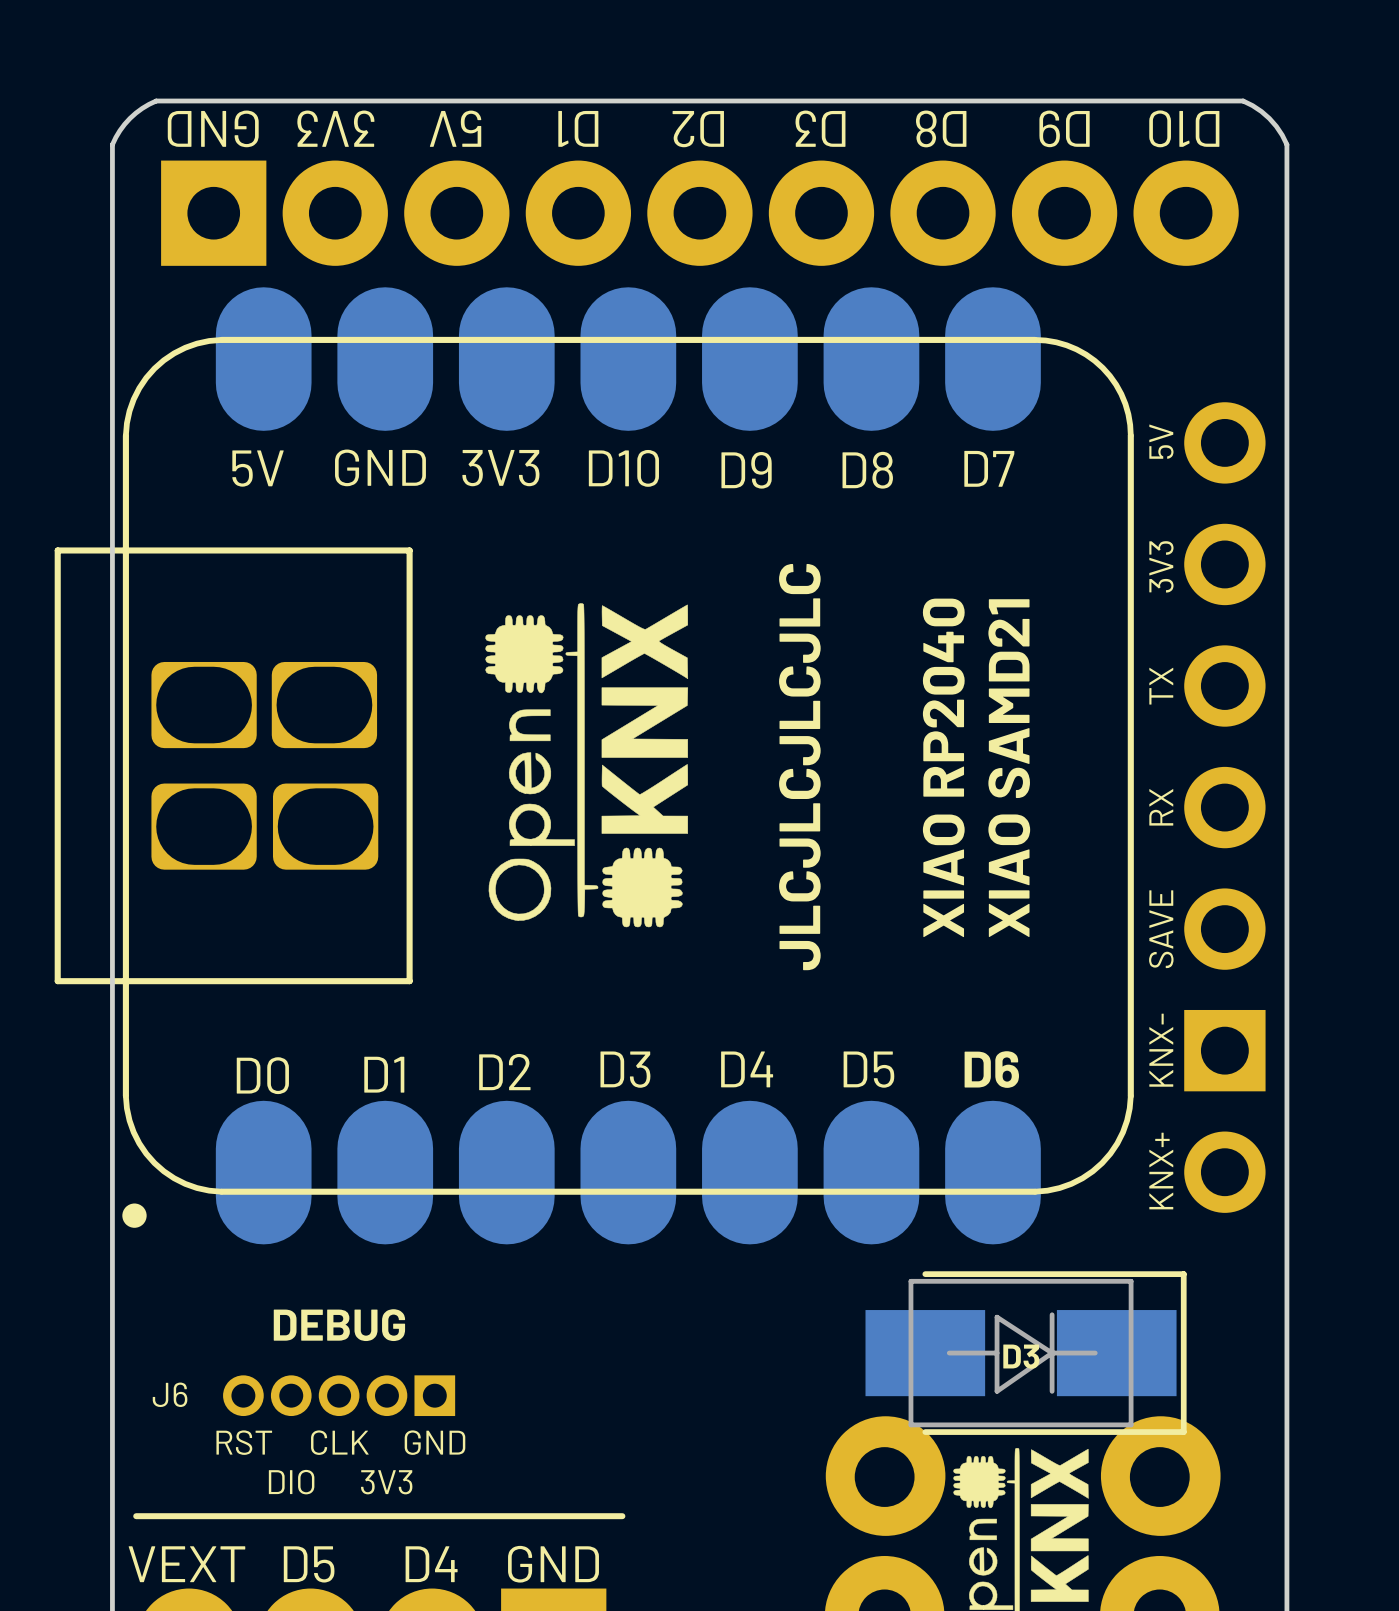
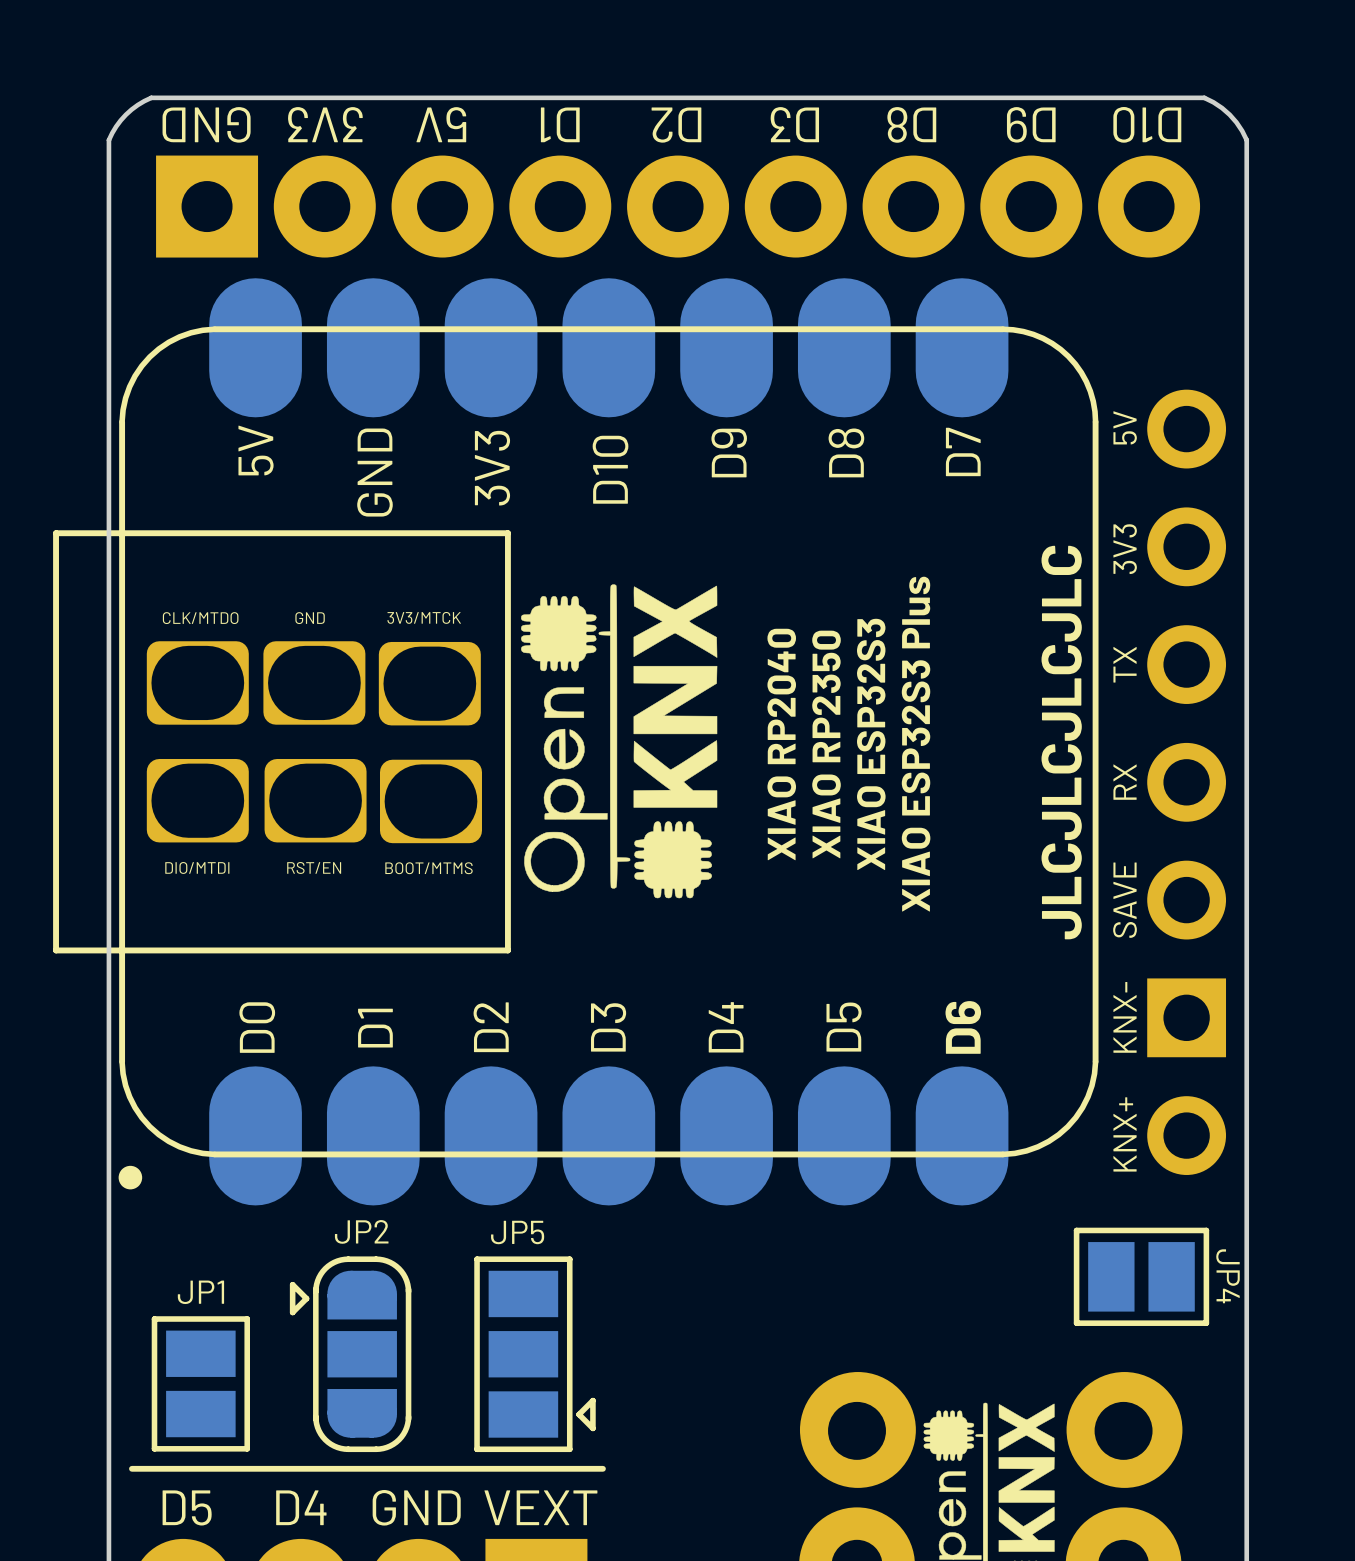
part footprint: [54, 287, 1134, 1245] -> [53, 278, 1099, 1206]
drawing position: (586, 765) -> (619, 741)
text position: JLCJLCJLCJLC (799, 767) -> JLCJLCJLCJLC (1061, 742)
text: XIAO RP2040 (943, 767) -> XIAO ESP32S3 Plus (916, 744)
text: none -> XIAO RP2040 (781, 744)
text: none -> XIAO RP2350 (826, 744)
text: none -> XIAO ESP32S3 (871, 744)
text: XIAO SAMD21 (1009, 768) -> none
JP4: none -> (1141, 1276)
D3: (1026, 1353) -> none
J6: (339, 1395) -> none
JP2: none -> (350, 1354)
JP5: none -> (534, 1354)
JP1: none -> (200, 1383)
text position: VEXT (186, 1564) -> VEXT (540, 1507)
text position: D5 (309, 1564) -> D5 (187, 1507)
text position: D4 (431, 1564) -> D4 (301, 1507)
text position: GND (553, 1564) -> GND (416, 1507)

